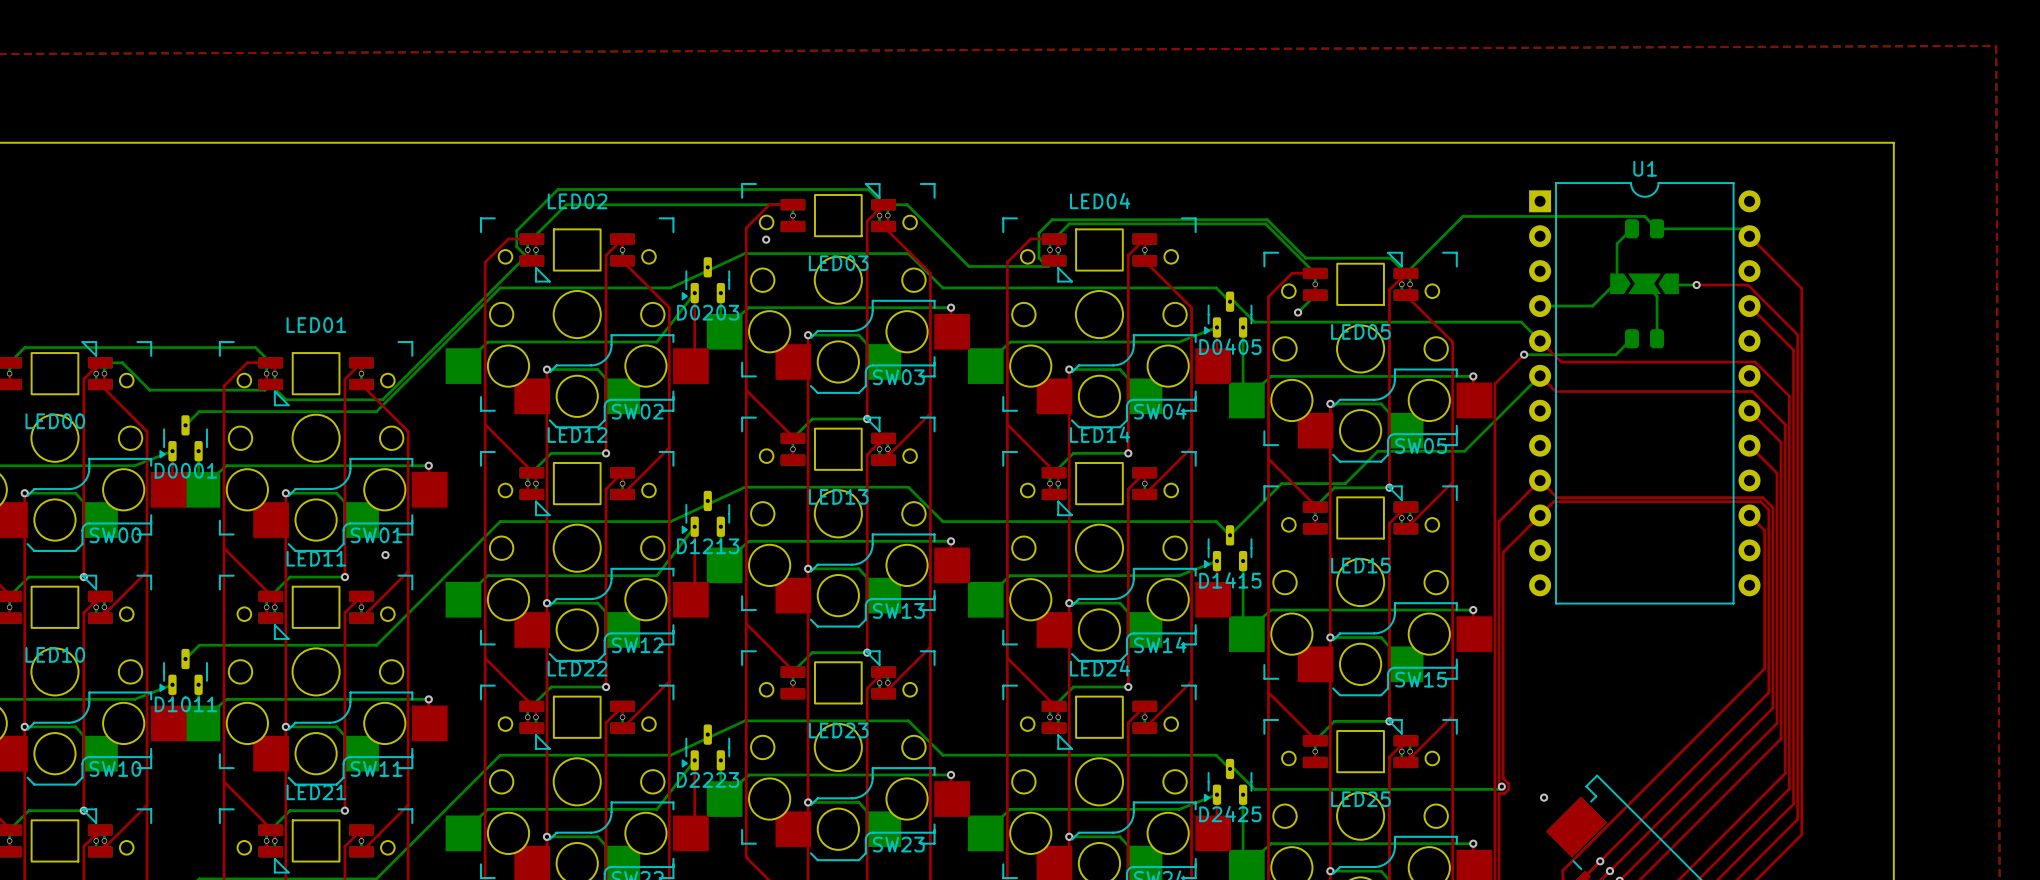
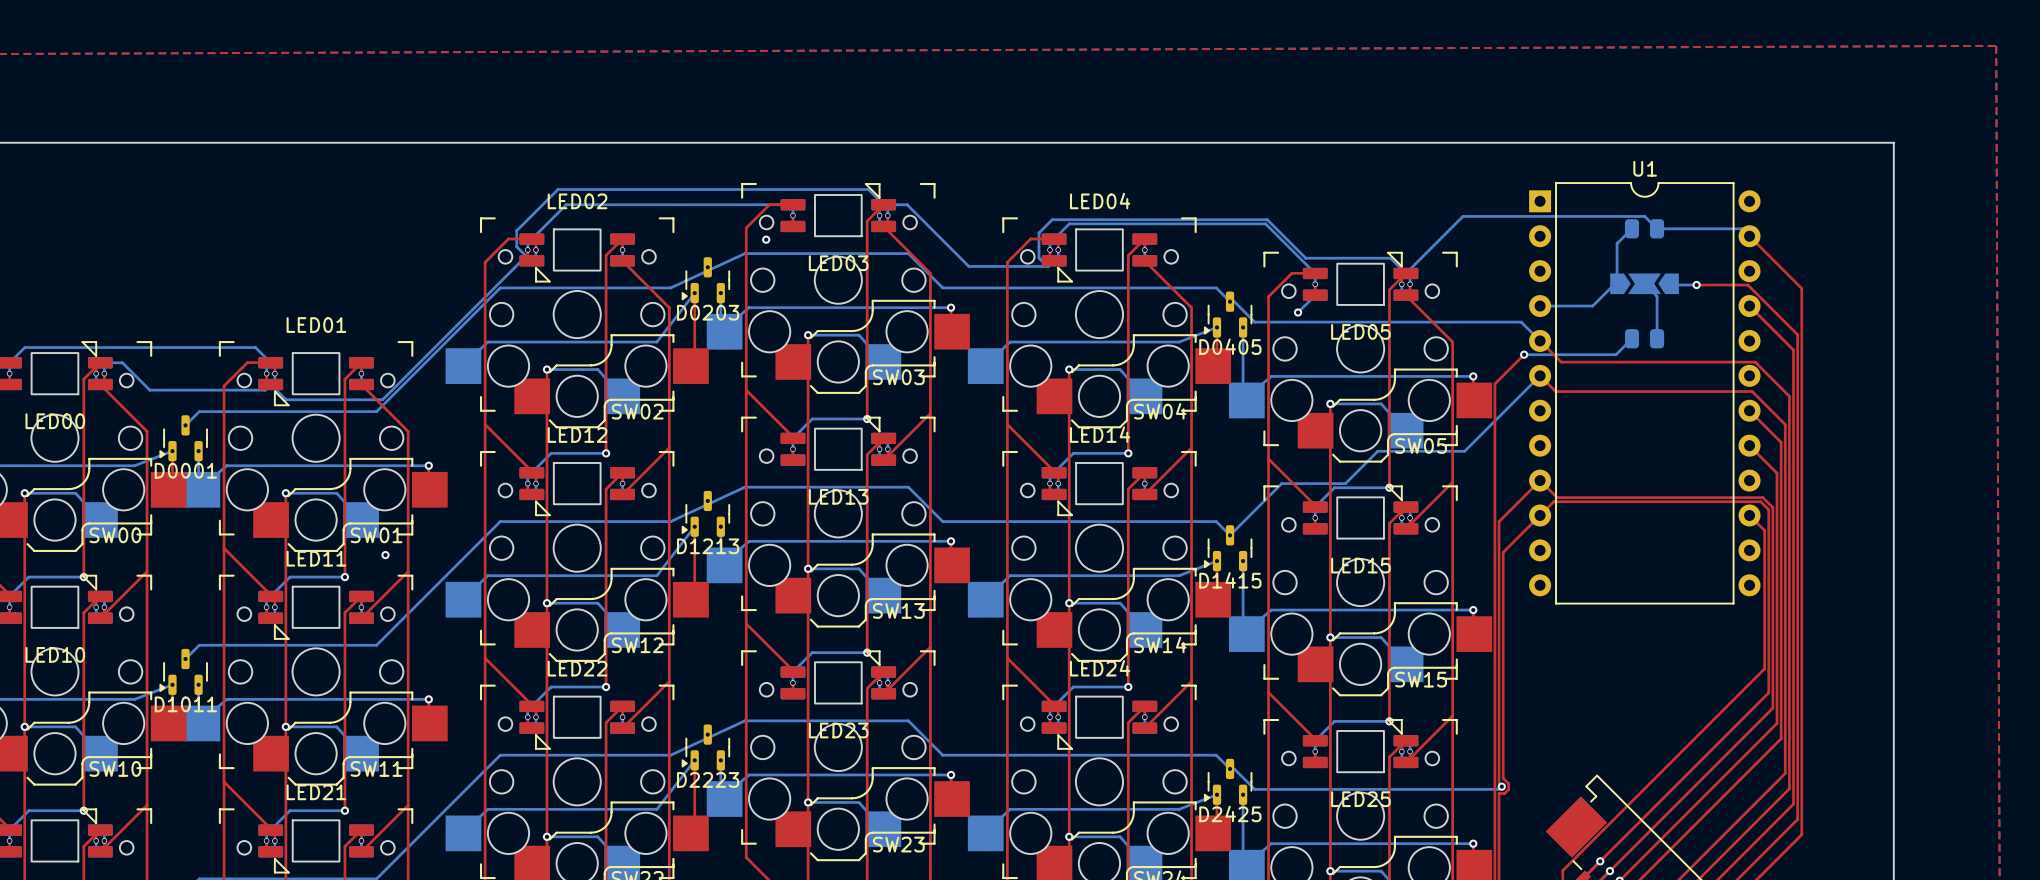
via: (1544, 797) -> none

